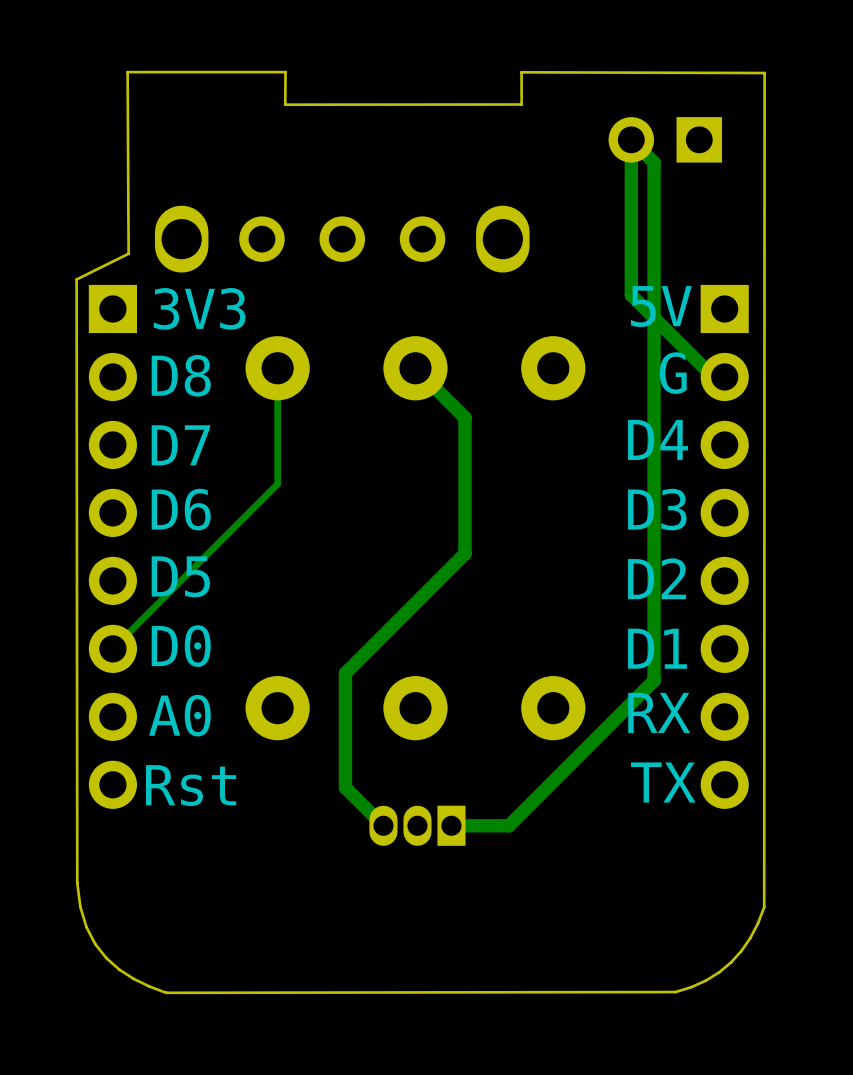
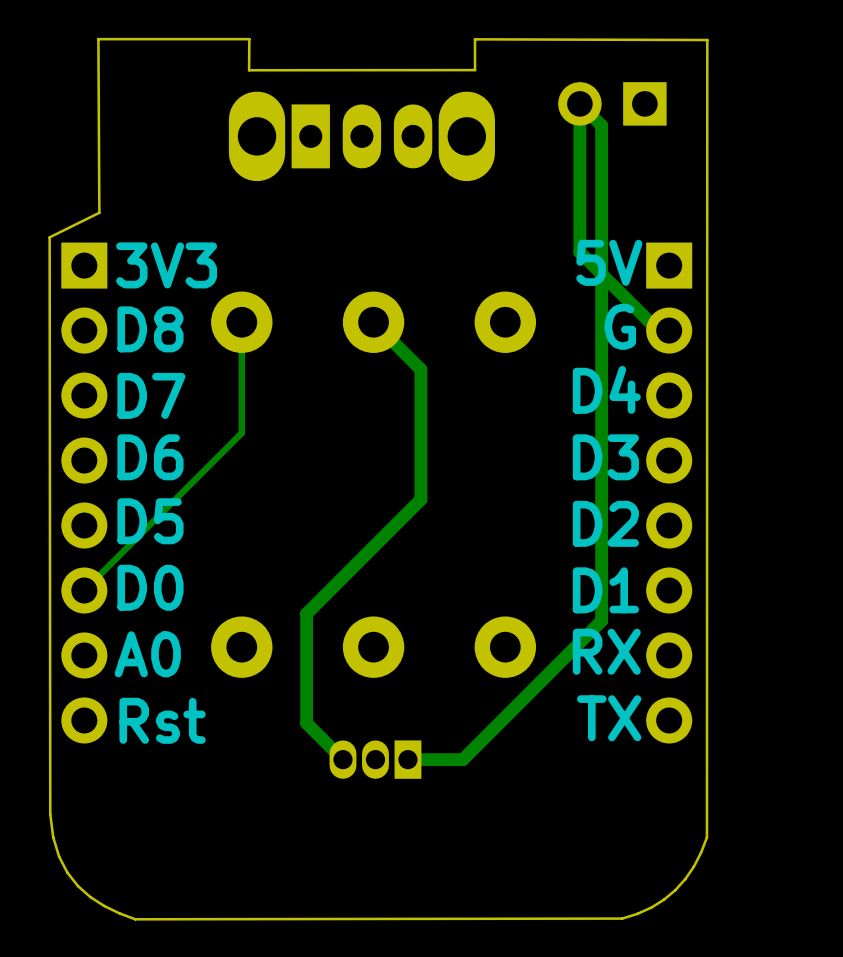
part: none -> (361, 136)
part: (342, 239) -> none

